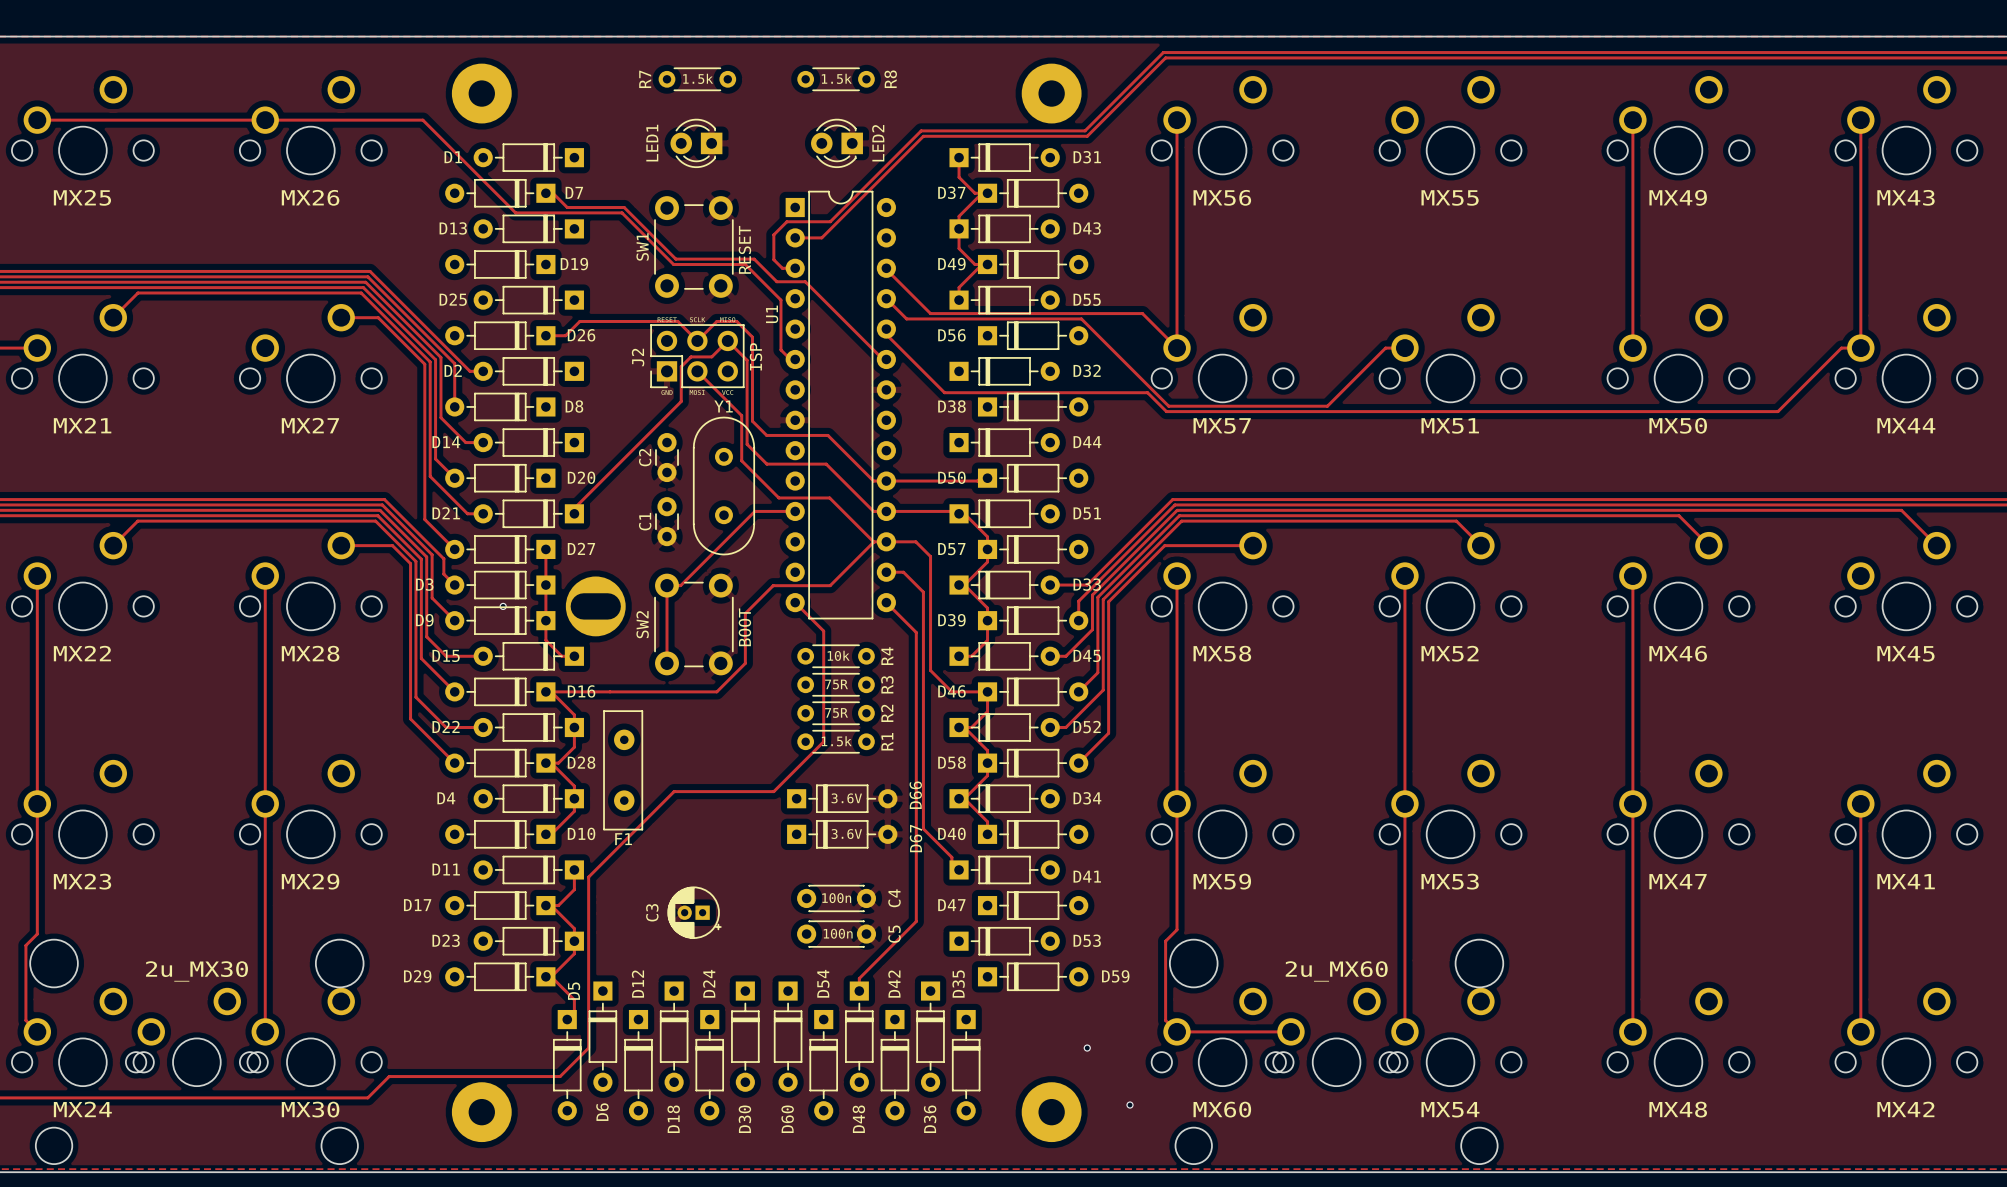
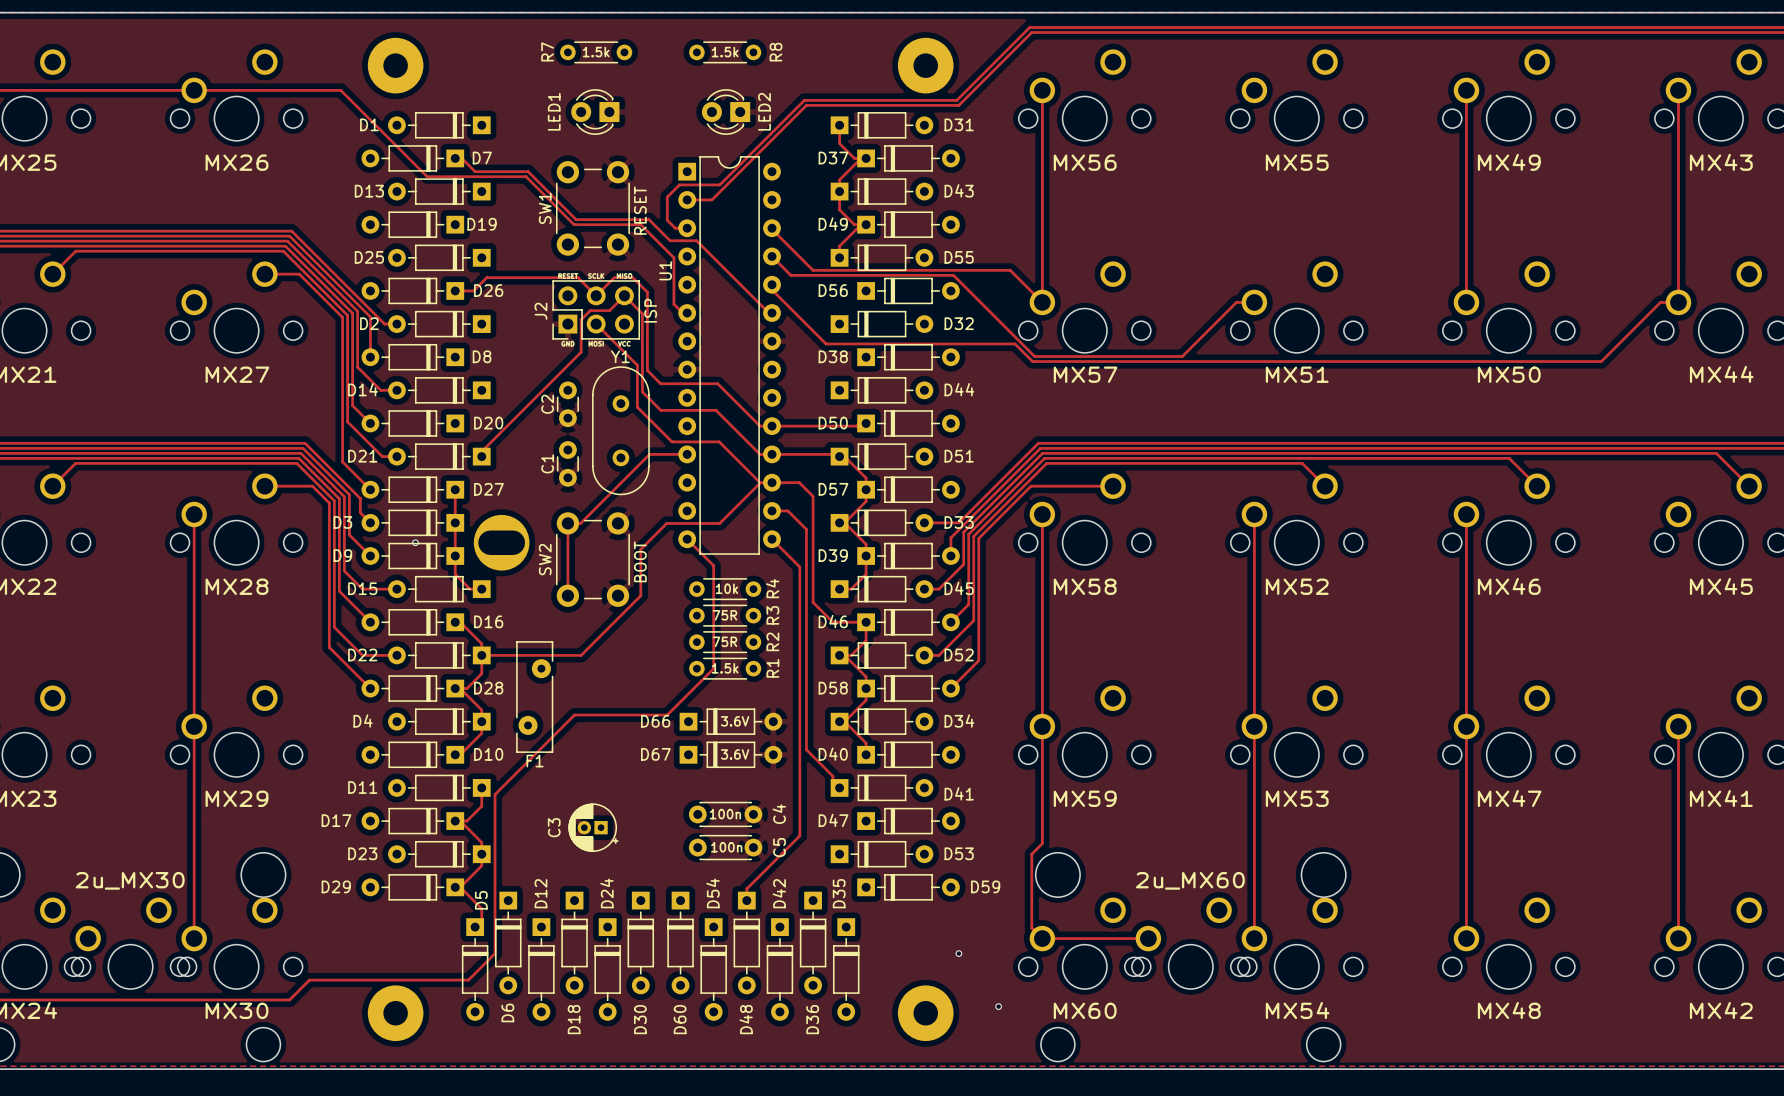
track: (551, 691) (716, 691) -> (481, 655) (581, 655) (614, 622)
F1 footprint: [603, 710, 644, 831] -> [516, 641, 554, 753]
D66 name rotation: 0° (915, 795) -> 90° clockwise (655, 721)
D66 name position: D66 (915, 795) -> D66 (655, 721)
D67 name rotation: 0° (916, 838) -> 90° clockwise (655, 754)
D67 name position: D67 (916, 838) -> D67 (655, 754)

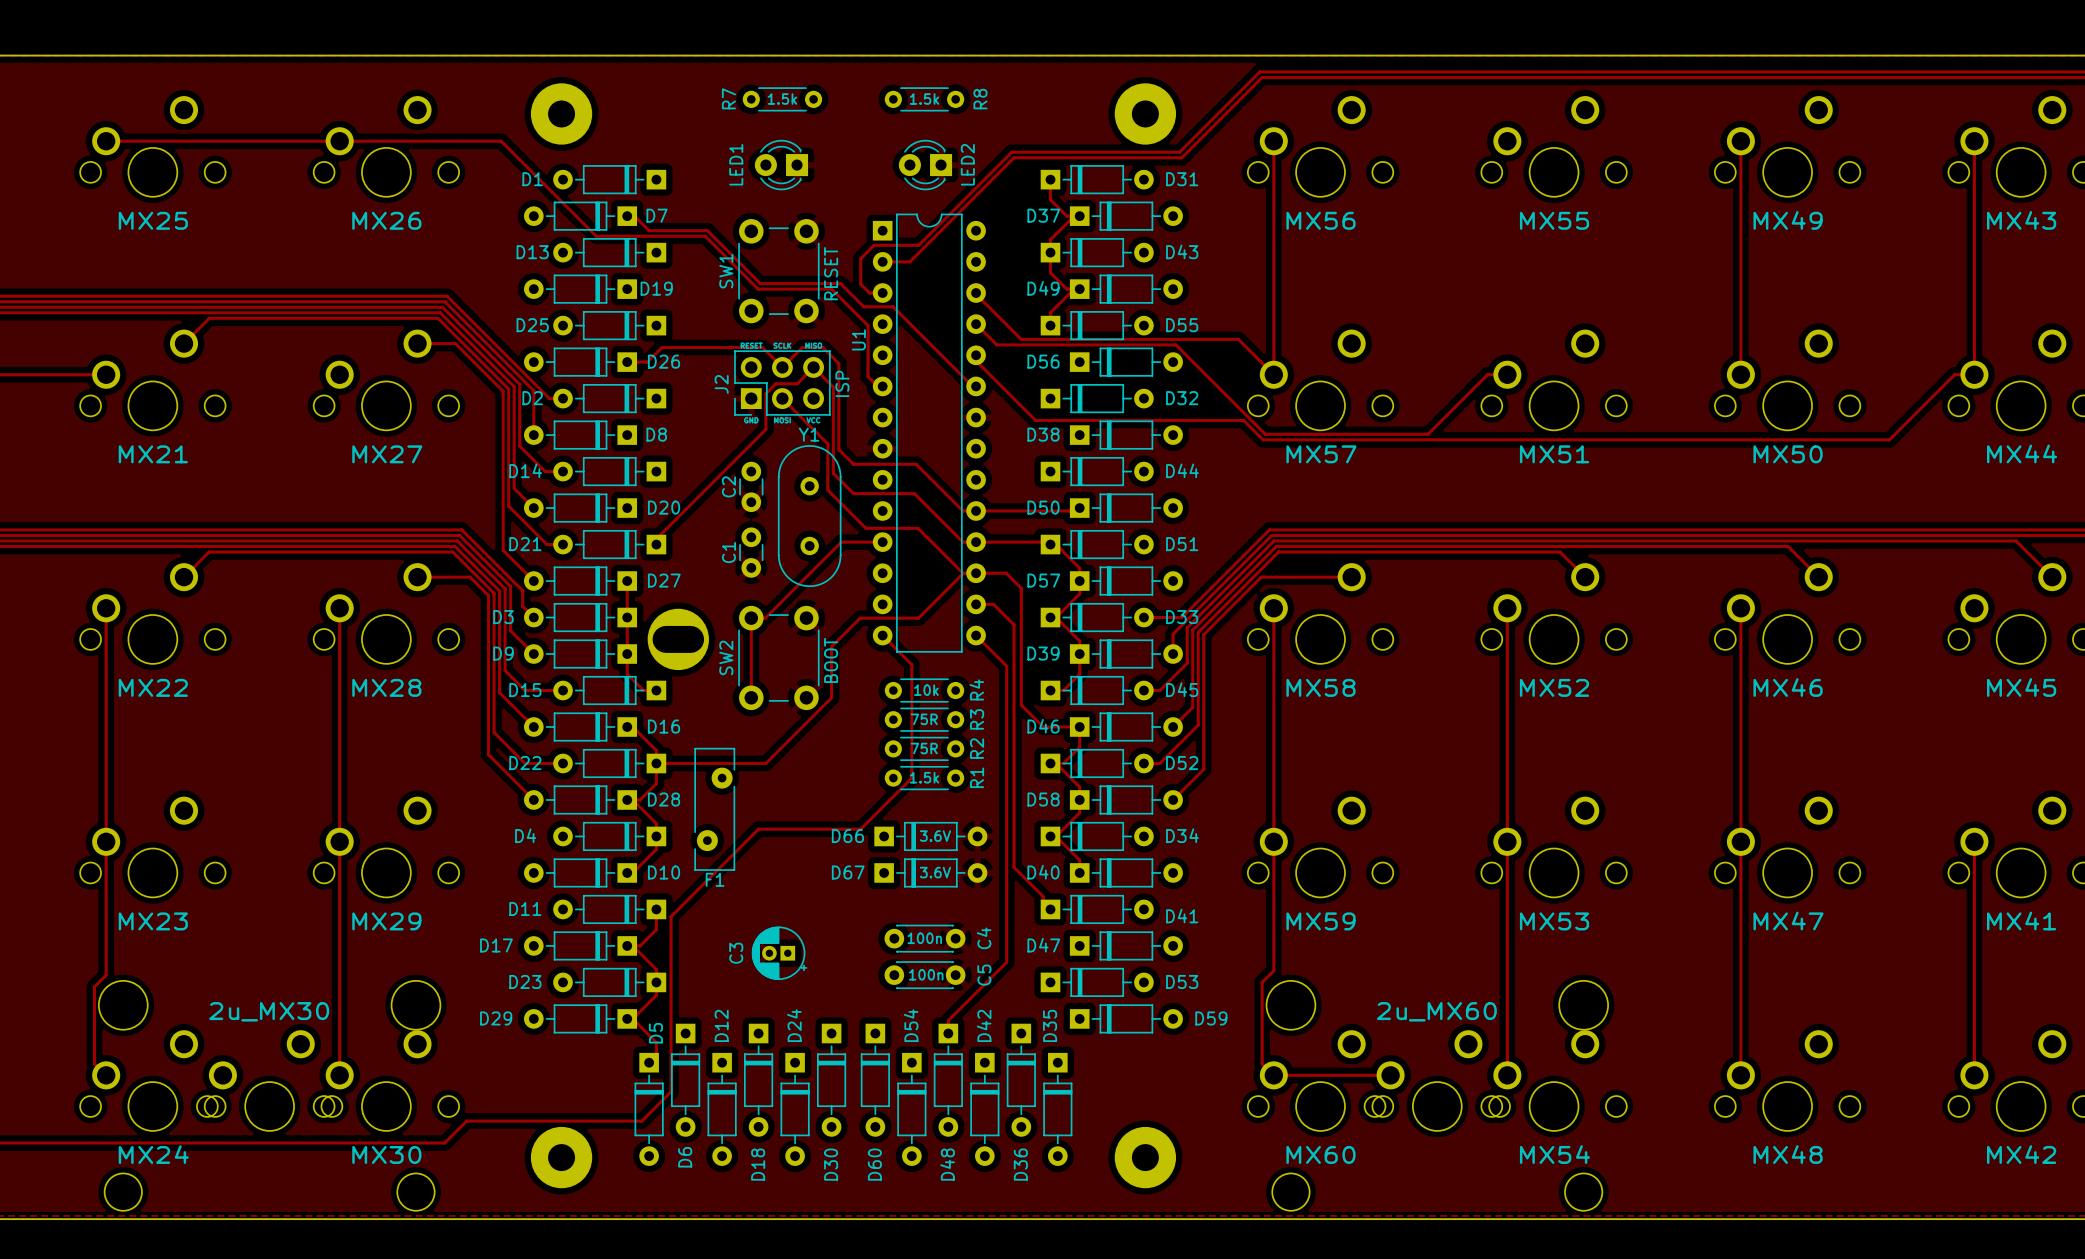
via: (415, 542) -> none
via: (958, 953) -> none
via: (998, 1006) -> none

